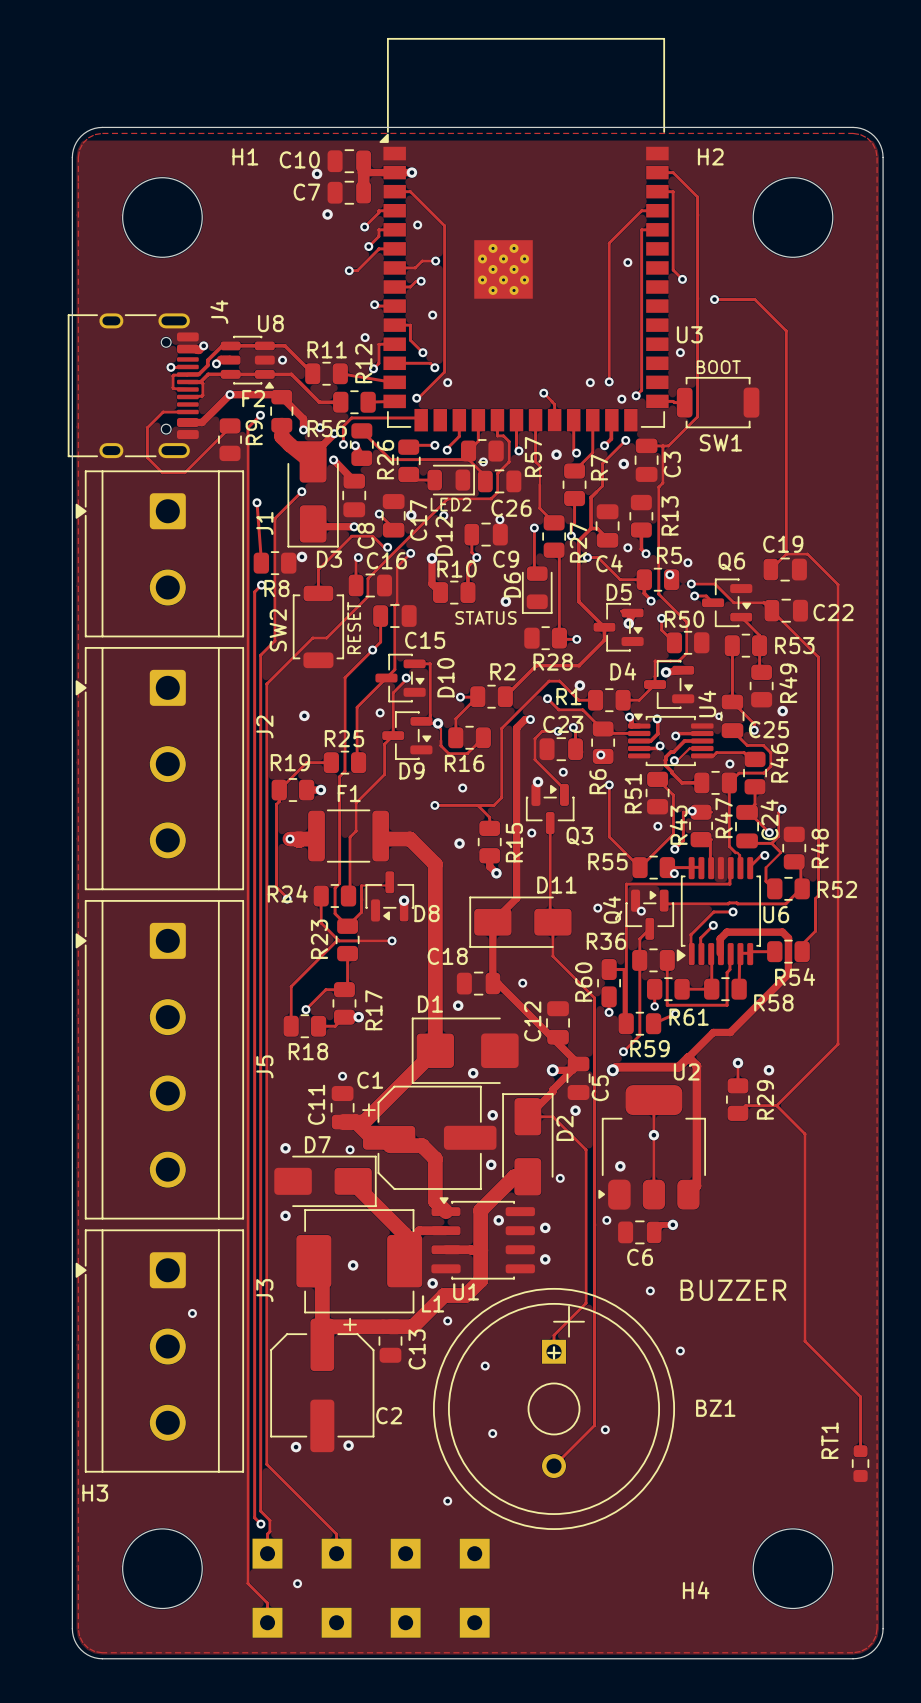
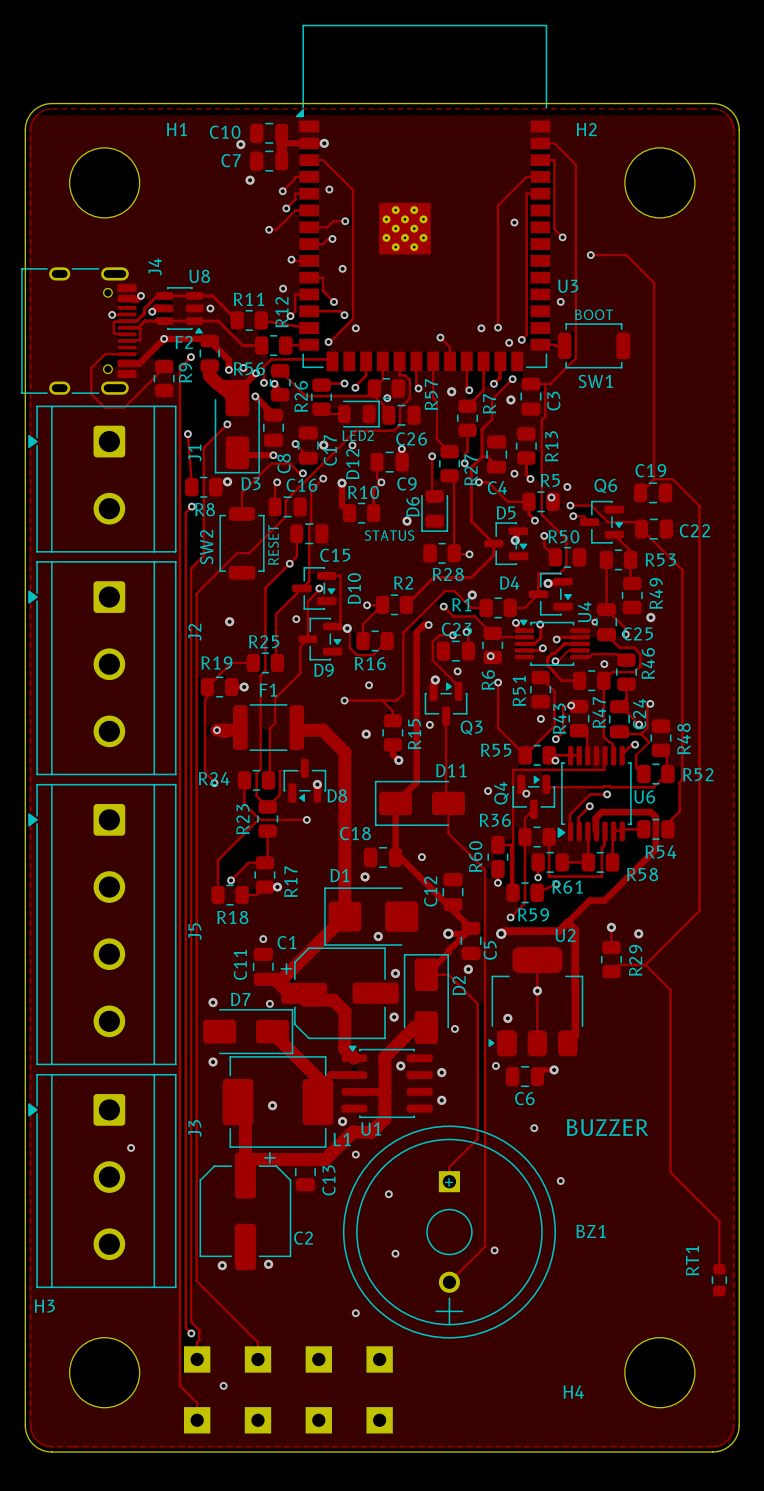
BZ1 footprint: [432, 1287, 676, 1530] -> [342, 1125, 557, 1339]

